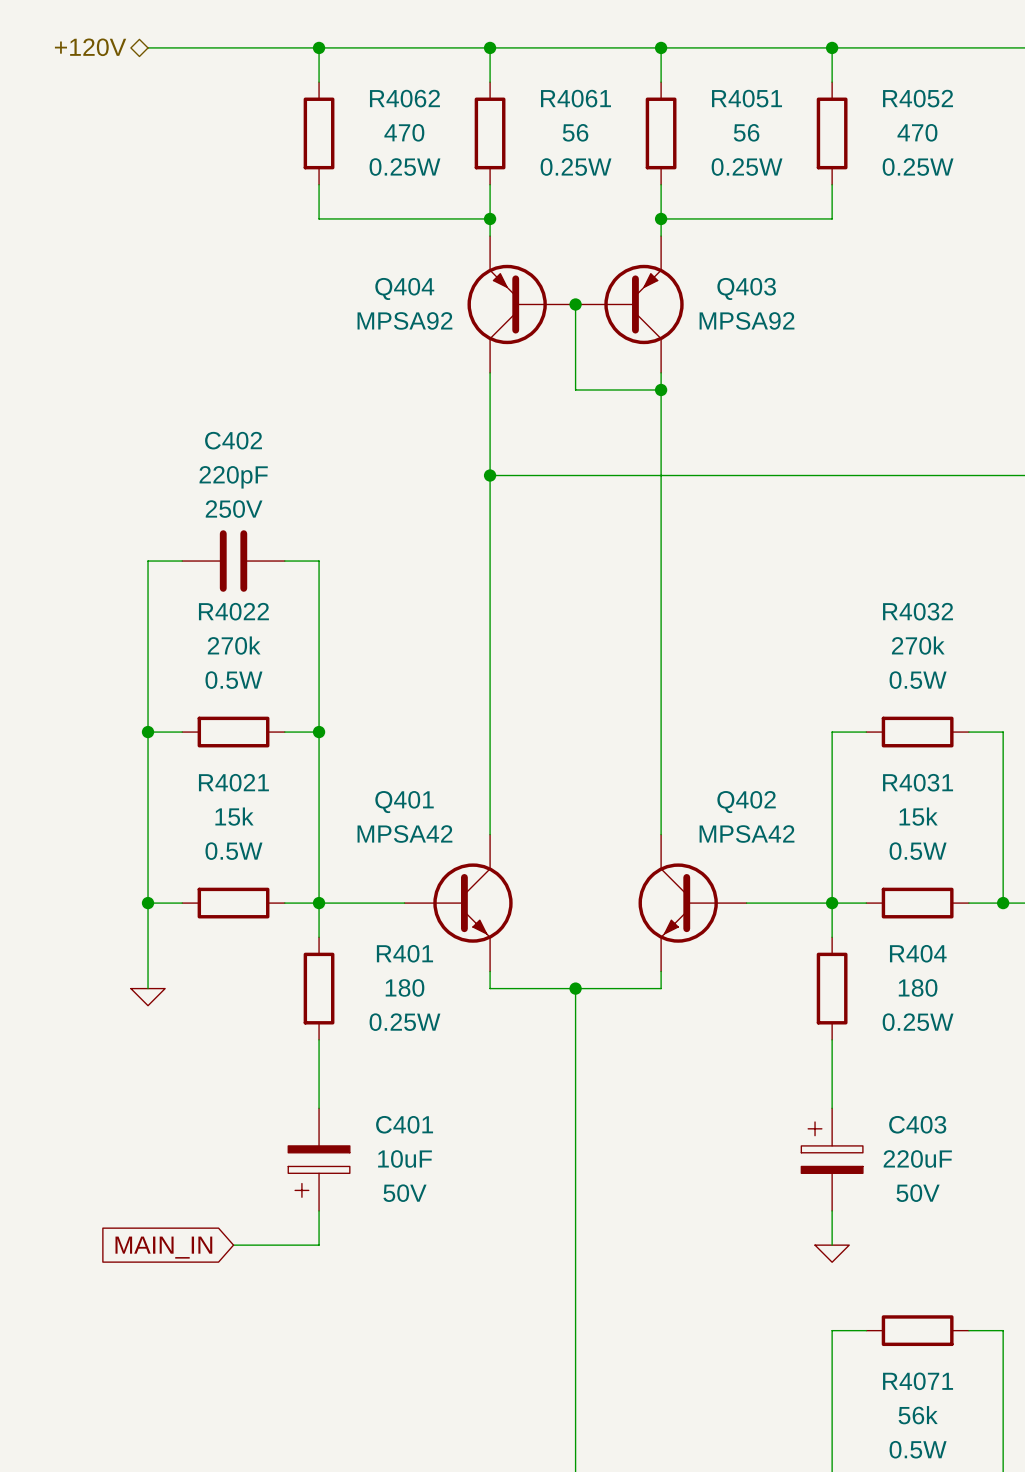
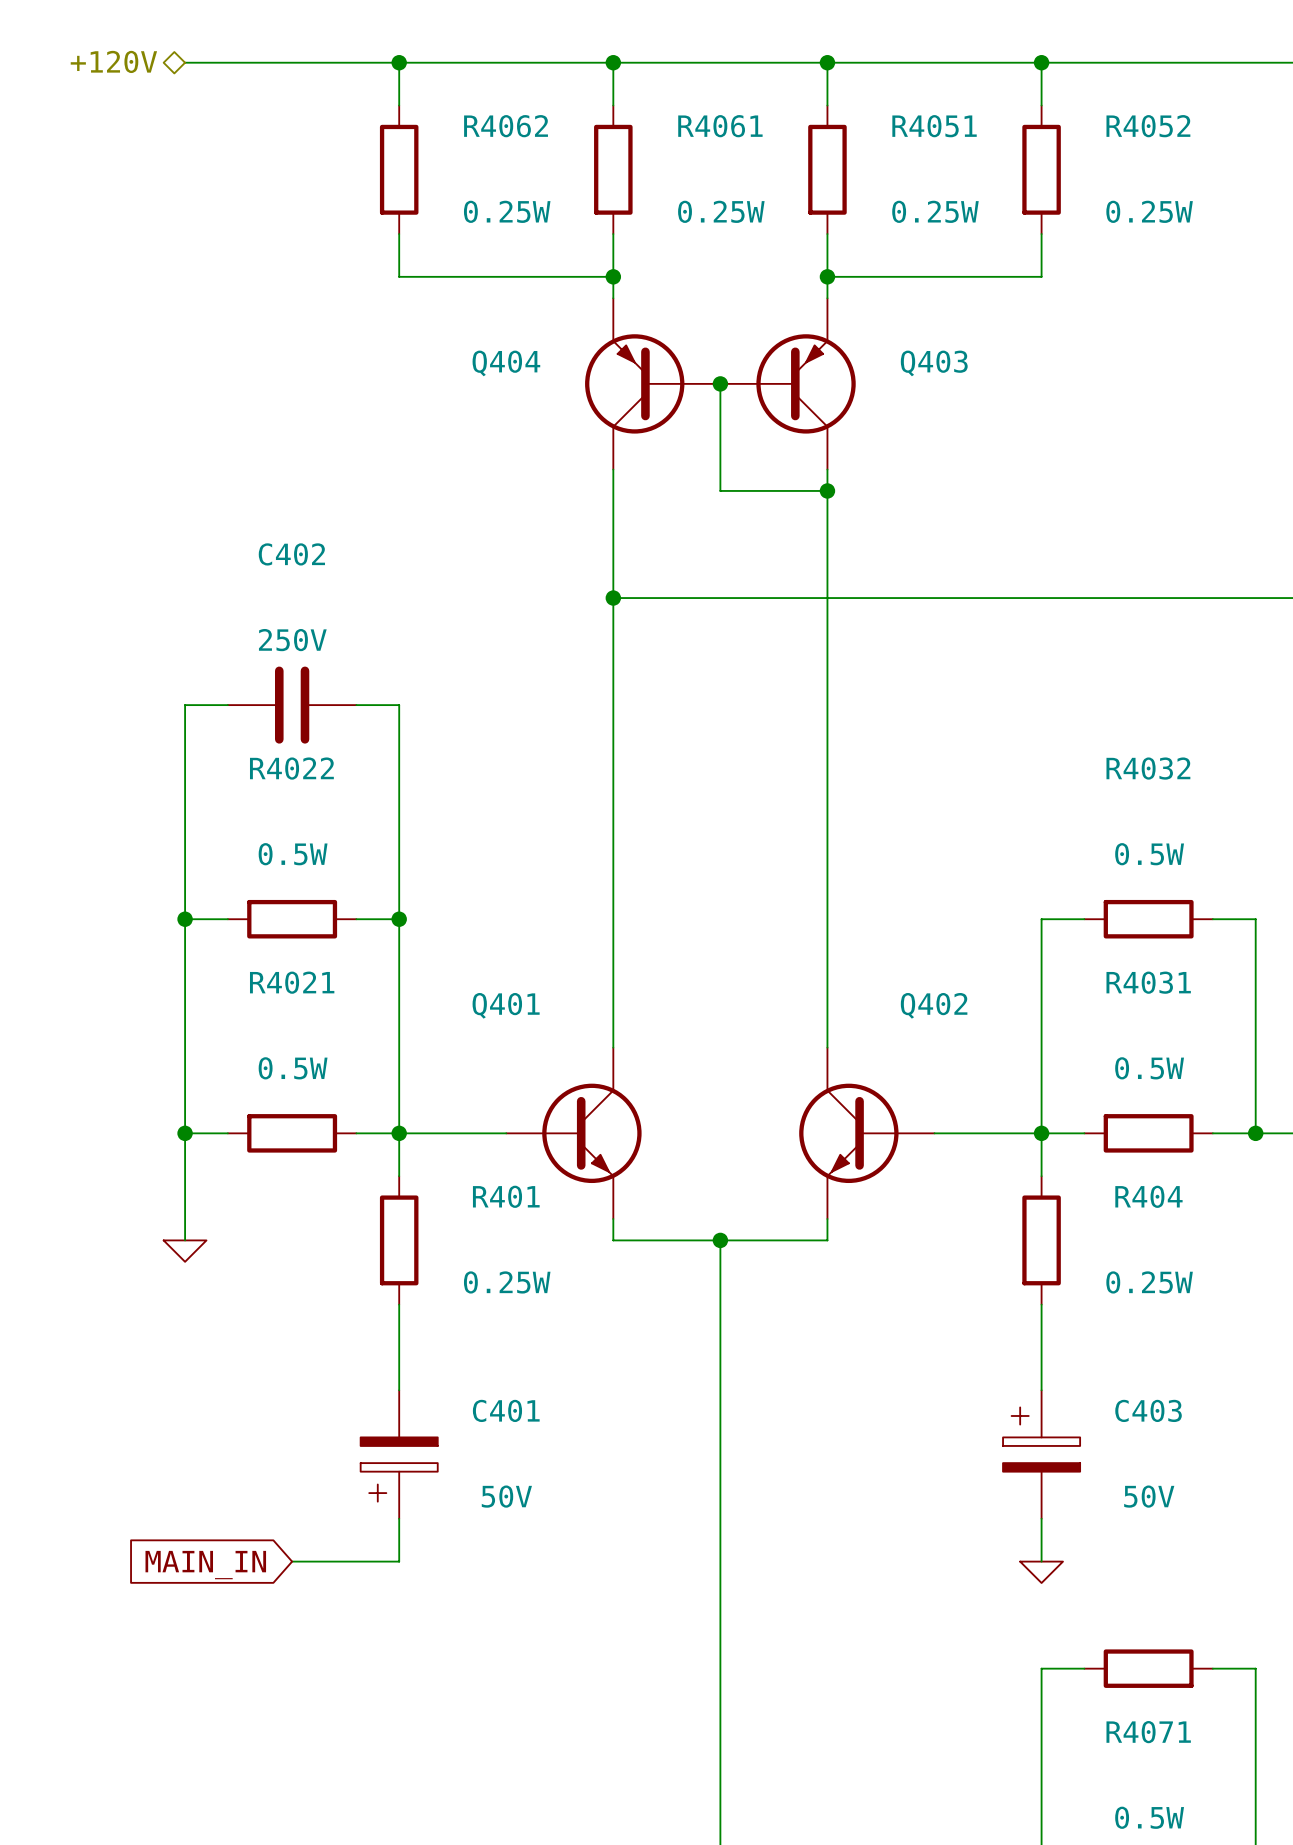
R4062 value: 470 (404, 132) -> none
R4061 value: 56 (575, 132) -> none
R4051 value: 56 (746, 132) -> none
R4052 value: 470 (917, 132) -> none
Q404 value: MPSA92 (404, 320) -> none
Q403 value: MPSA92 (747, 320) -> none
C402 value: 220pF (233, 477) -> none
R4022 value: 270k (234, 645) -> none
R4032 value: 270k (918, 645) -> none
R4021 value: 15k (234, 816) -> none
R4031 value: 15k (918, 816) -> none
Q401 value: MPSA42 (404, 834) -> none
Q402 value: MPSA42 (747, 834) -> none
R401 value: 180 (405, 987) -> none
R404 value: 180 (918, 987) -> none
C401 value: 10uF (405, 1158) -> none
C403 value: 220uF (917, 1158) -> none
R4071 value: 56k (918, 1415) -> none

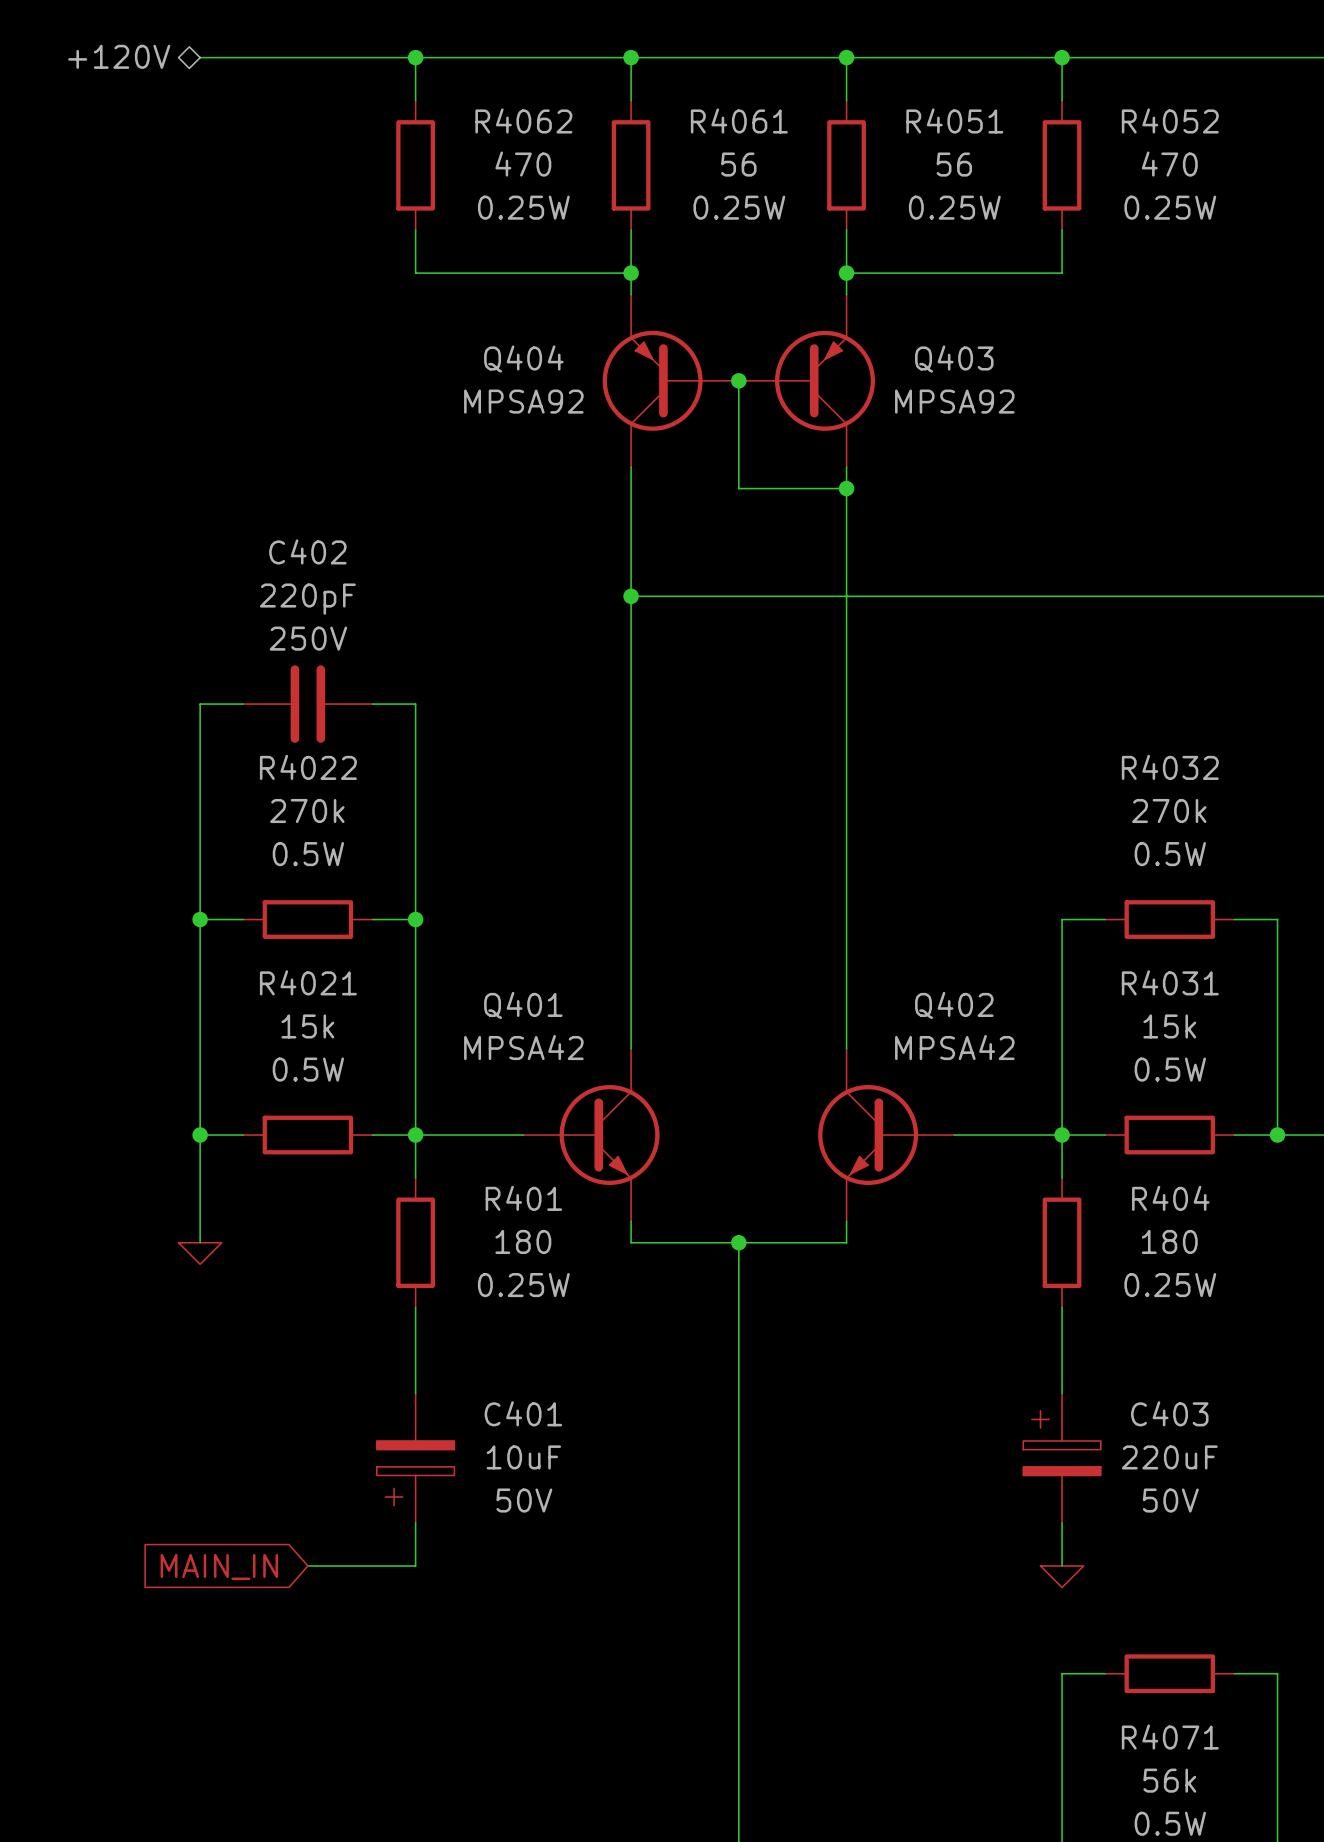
R4062 value: none -> 470 (523, 164)
R4061 value: none -> 56 (738, 164)
R4051 value: none -> 56 (954, 164)
R4052 value: none -> 470 (1169, 164)
Q404 value: none -> MPSA92 (523, 401)
Q403 value: none -> MPSA92 (954, 401)
C402 value: none -> 220pF (307, 599)
R4022 value: none -> 270k (307, 811)
R4032 value: none -> 270k (1169, 811)
R4021 value: none -> 15k (307, 1026)
R4031 value: none -> 15k (1169, 1026)
Q401 value: none -> MPSA42 (523, 1047)
Q402 value: none -> MPSA42 (954, 1047)
R401 value: none -> 180 (523, 1241)
R404 value: none -> 180 (1169, 1241)
C401 value: none -> 10uF (523, 1457)
C403 value: none -> 220uF (1169, 1457)
R4071 value: none -> 56k (1169, 1780)

